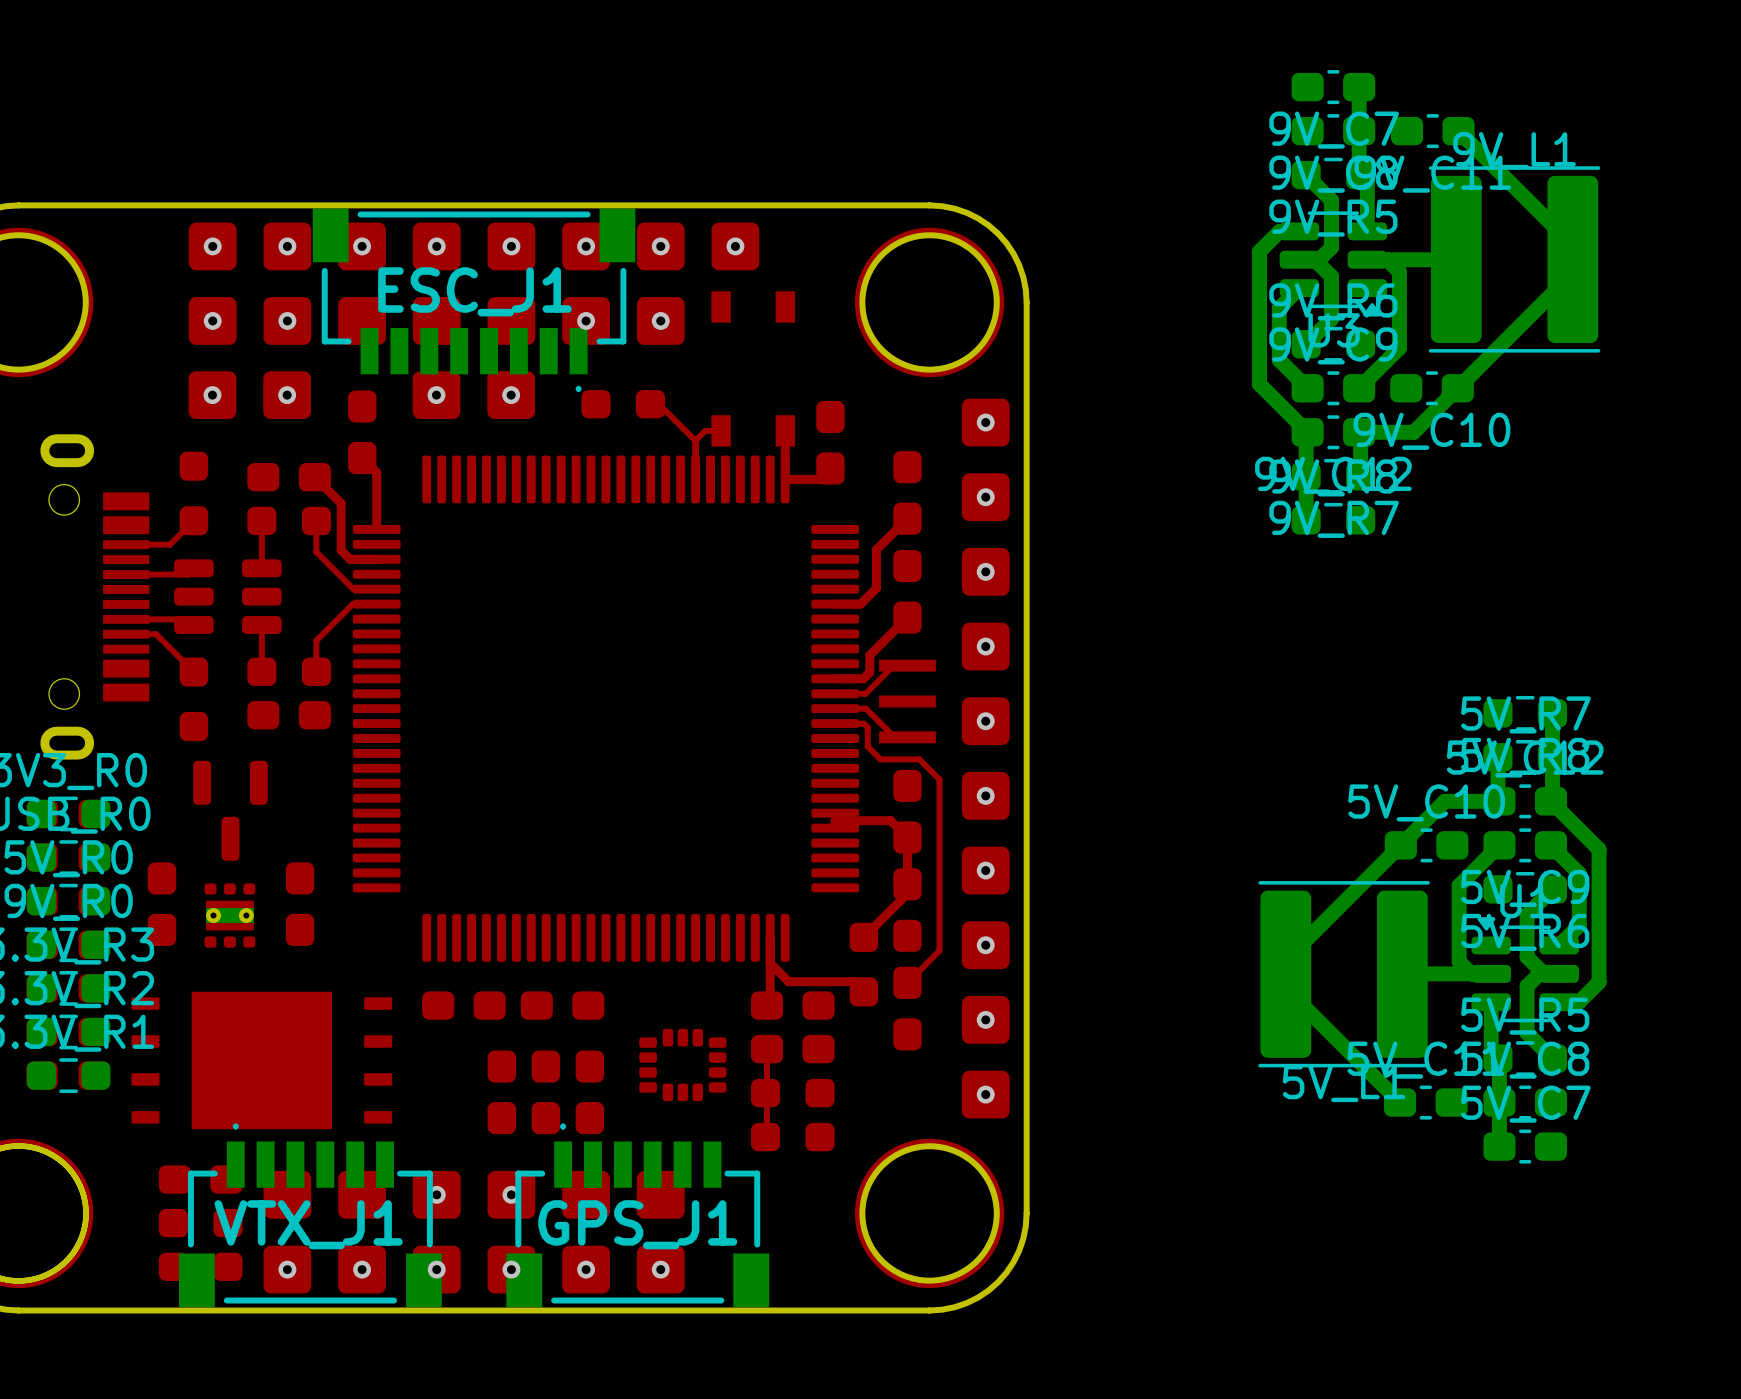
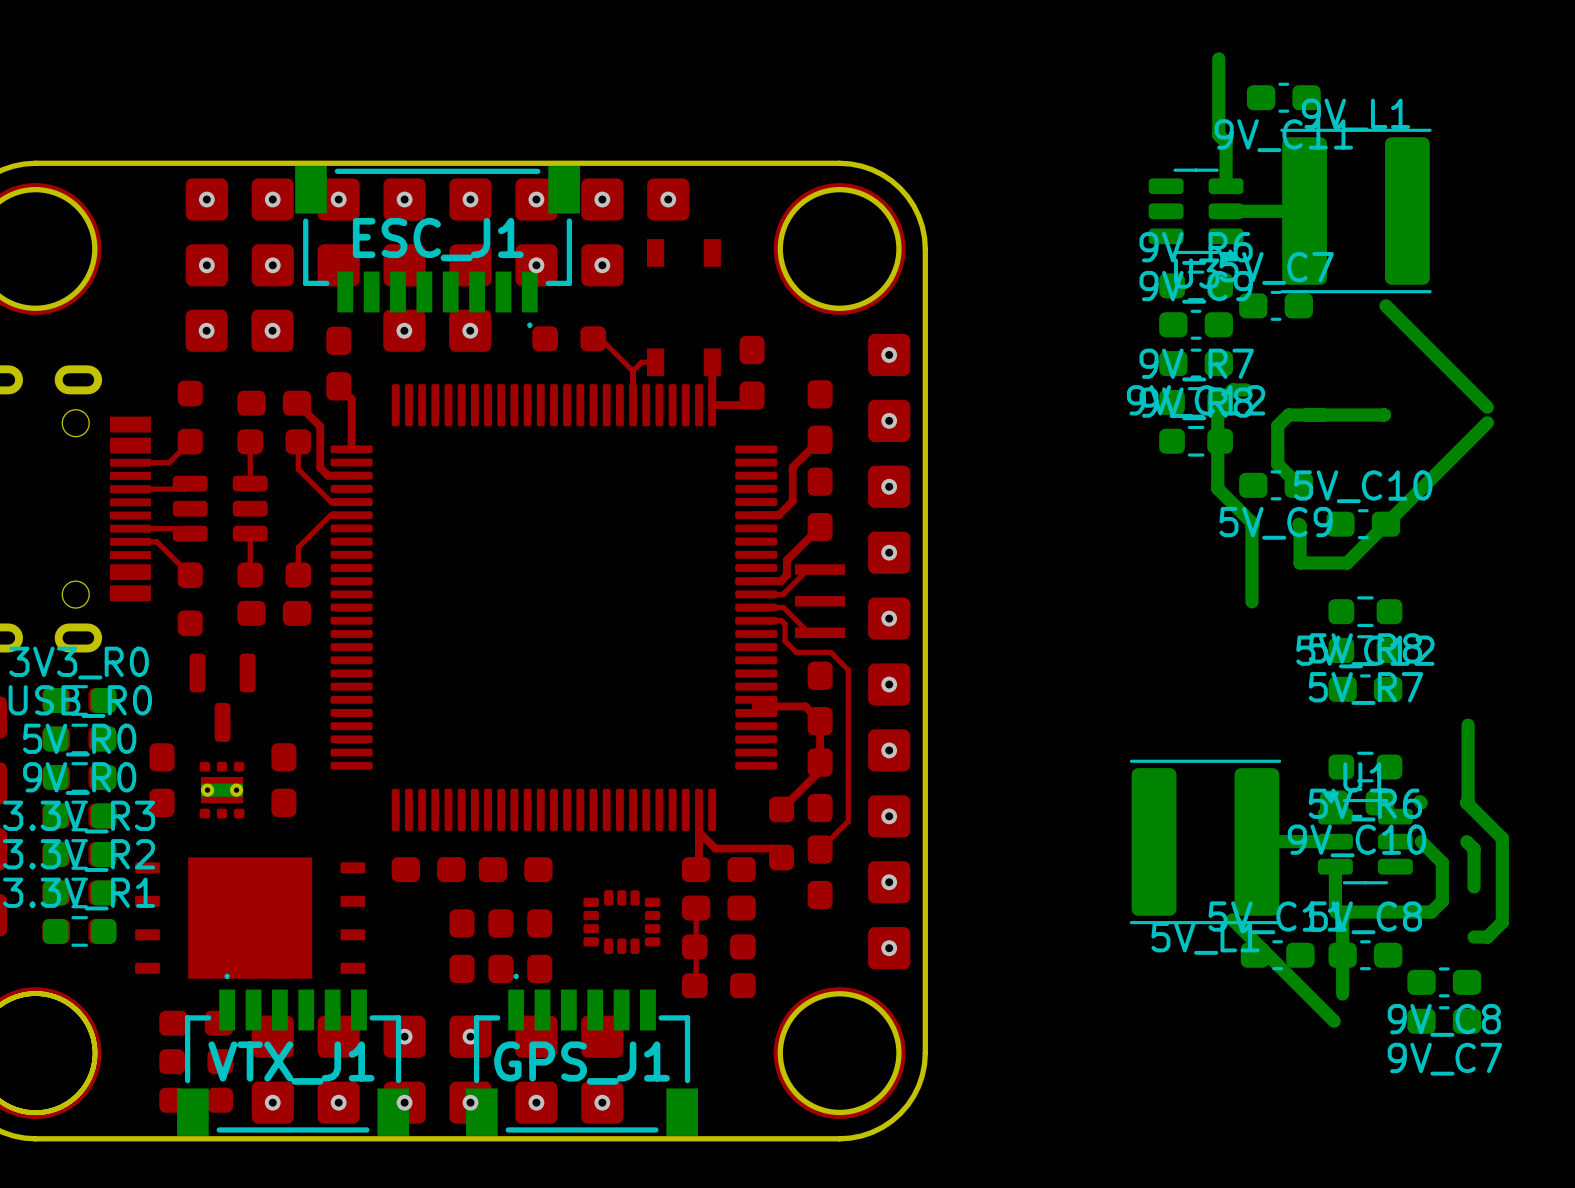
9V_C7 position: (1333, 87) -> (1444, 1021)
9V_C8 position: (1333, 131) -> (1444, 982)
bottom track: (1458, 131) (1572, 245) (1572, 273) (1413, 432) (1359, 432) (1360, 476) -> none
bottom track: (1306, 175) (1331, 200) (1331, 247) (1319, 259) (1299, 259) -> none
9V_R5: (1333, 175) -> none
bottom track: (1299, 231) (1279, 231) (1259, 251) (1259, 384) (1307, 432) (1306, 520) -> none
bottom track: (1314, 259) (1331, 276) (1331, 318) (1306, 344) -> none
bottom track: (1387, 259) (1399, 272) (1399, 348) (1359, 388) -> none
bottom track: (1299, 288) (1279, 308) (1279, 359) (1307, 388) -> none
bottom track: none -> (1385, 305) (1487, 407)
9V_C10 position: (1432, 388) -> (1357, 802)
bottom track: none -> (1246, 389) (1232, 389) (1217, 404) (1217, 488) (1253, 524) (1252, 601)
bottom track: none -> (1384, 415) (1288, 415) (1277, 425) (1277, 464) (1298, 485)
bottom track: none -> (1487, 422) (1347, 563) (1300, 563) (1298, 524)
9V_R7 name position: 9V_R7 (1334, 519) -> 9V_R7 (1196, 364)
bottom track: (1552, 713) (1550, 801) (1599, 849) (1599, 982) (1578, 1002) (1559, 1002) -> none
5V_R7 name position: 5V_R7 (1525, 714) -> 5V_R7 (1366, 688)
bottom track: (1497, 757) (1499, 801) (1444, 801) (1285, 960) (1285, 988) (1400, 1102) -> none
bottom track: none -> (1468, 725) (1466, 802) (1502, 838) (1502, 922) (1487, 937) (1474, 937)
5V_C10 position: (1426, 845) -> (1363, 524)
bottom track: (1499, 845) (1459, 885) (1459, 961) (1471, 973) -> none
5V_C9 position: (1525, 845) -> (1276, 485)
bottom track: (1550, 845) (1579, 873) (1579, 925) (1559, 945) -> none
bottom track: (1552, 889) (1527, 914) (1527, 957) (1543, 973) -> none
bottom track: none -> (1419, 801) (1421, 802)
bottom track: (1559, 973) (1539, 973) (1527, 986) (1527, 1033) (1552, 1058) -> none
bottom track: none -> (1421, 841) (1442, 862) (1442, 901) (1431, 912) (1335, 912)
bottom track: none -> (1466, 841) (1474, 848) (1474, 886)
5V_R5: (1525, 1058) -> none
bottom track: none -> (1232, 919) (1334, 1021)
5V_C7 position: (1525, 1146) -> (1276, 305)

